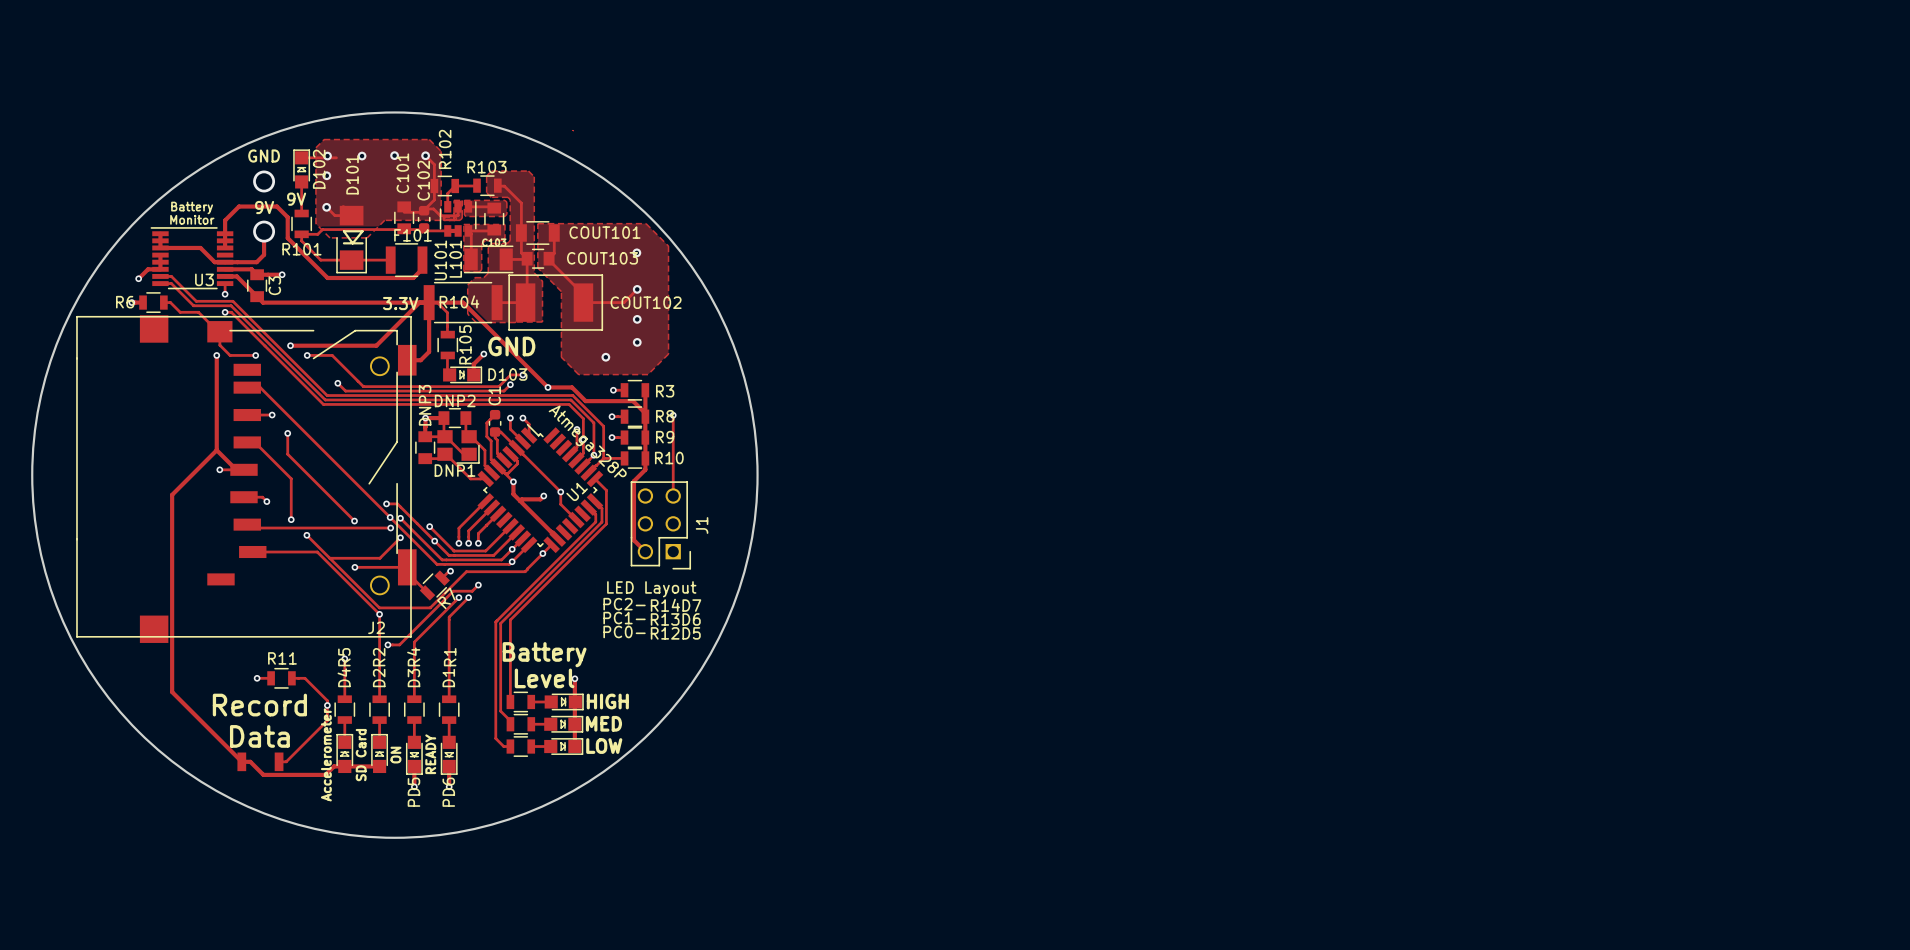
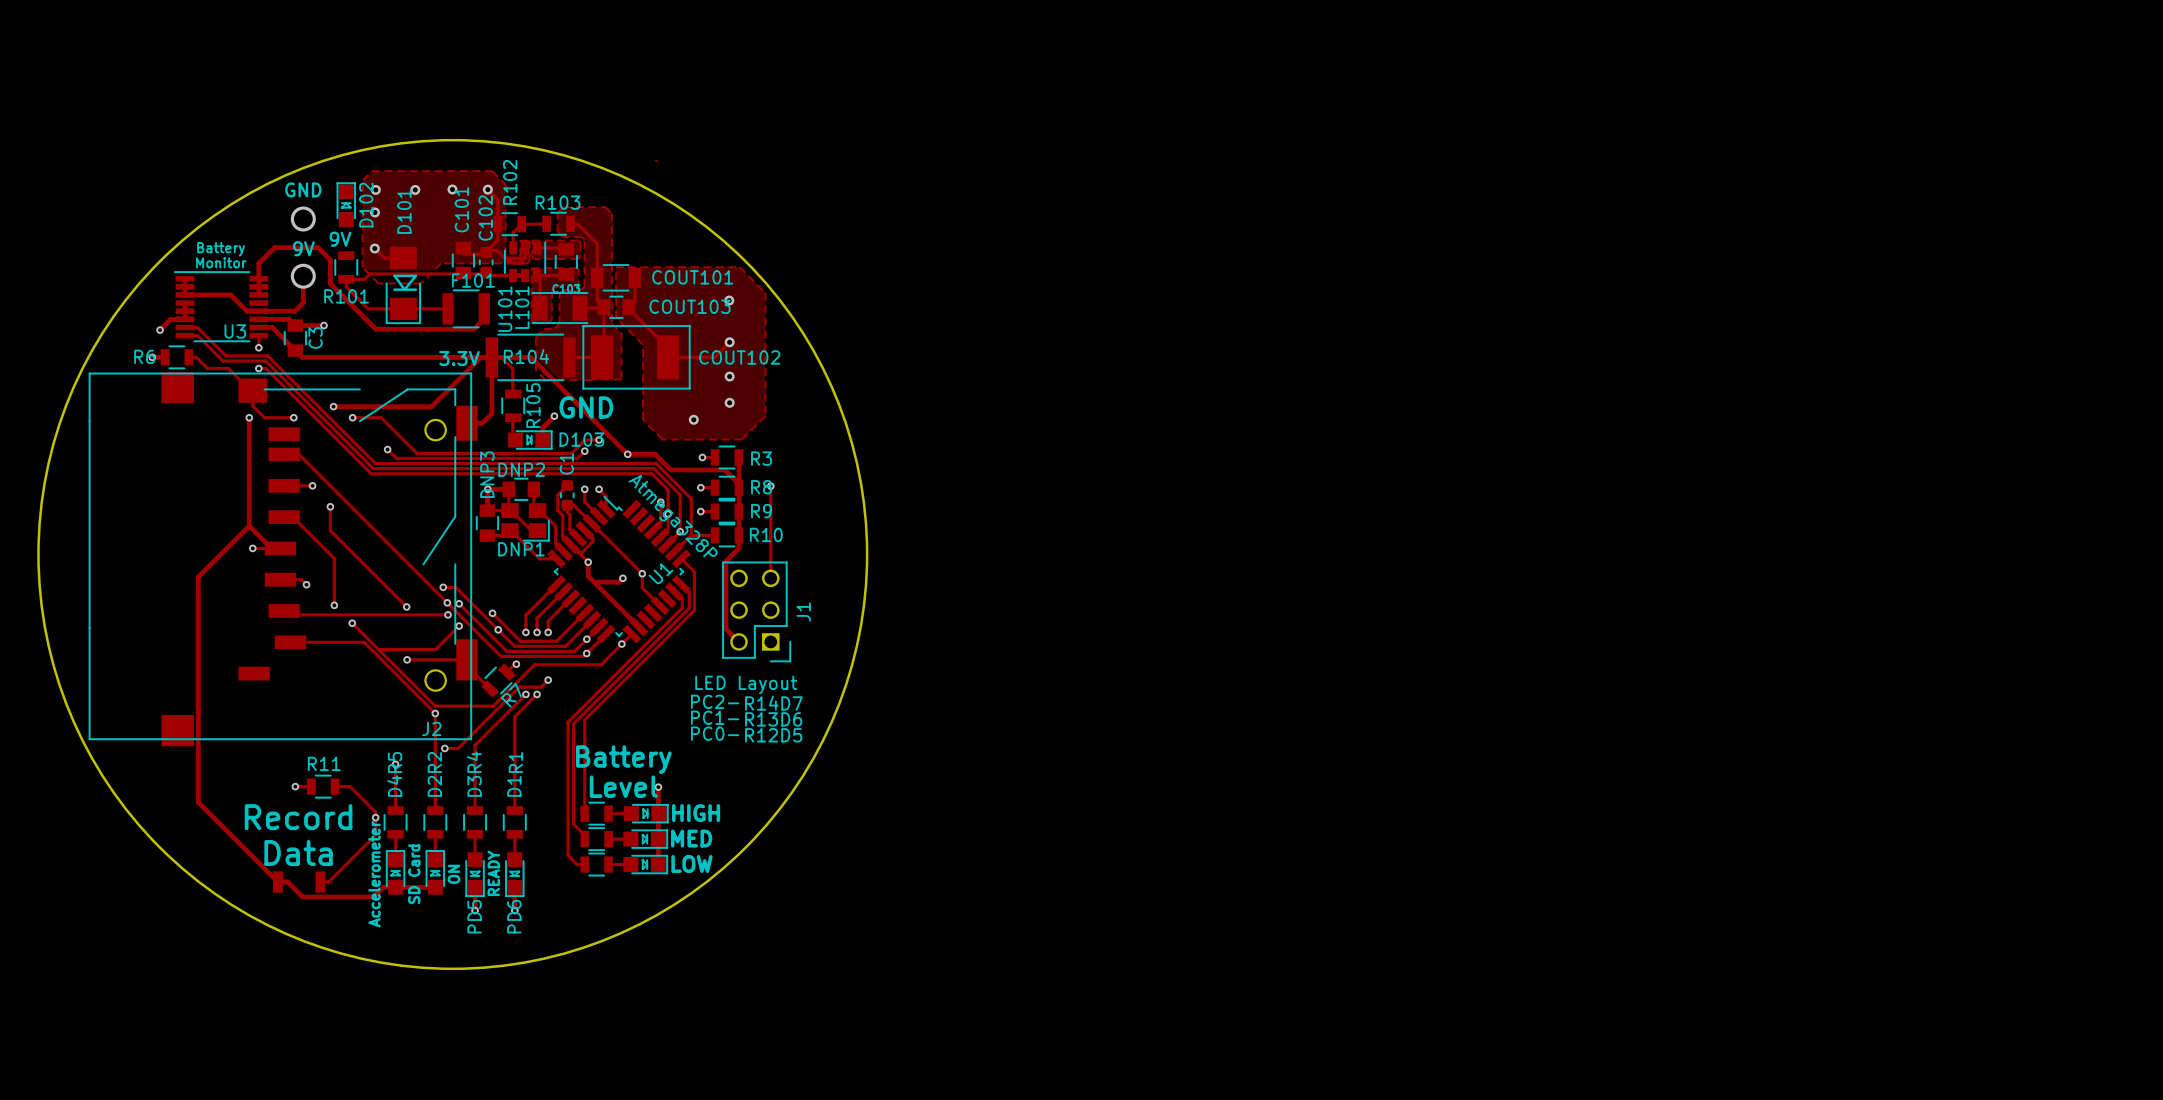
track: (301, 157) (336, 157) -> none
track: (301, 181) (301, 213) -> none

